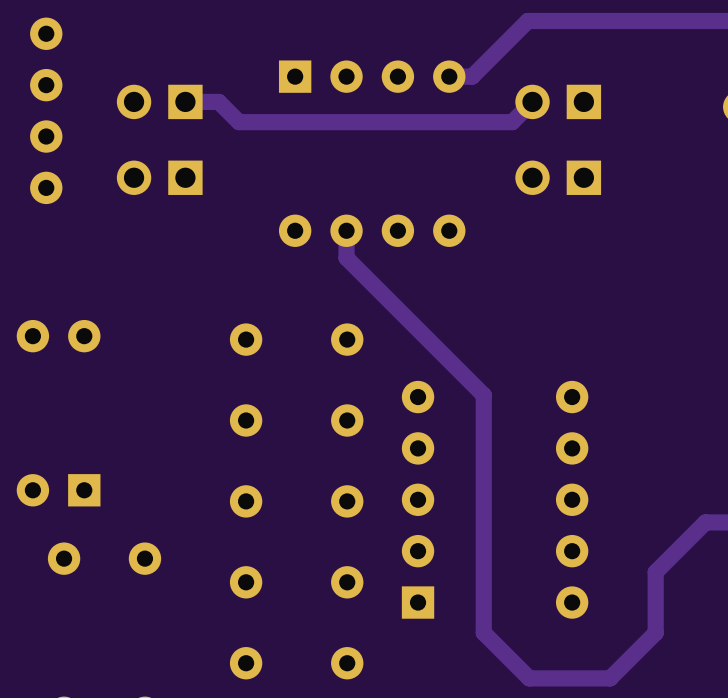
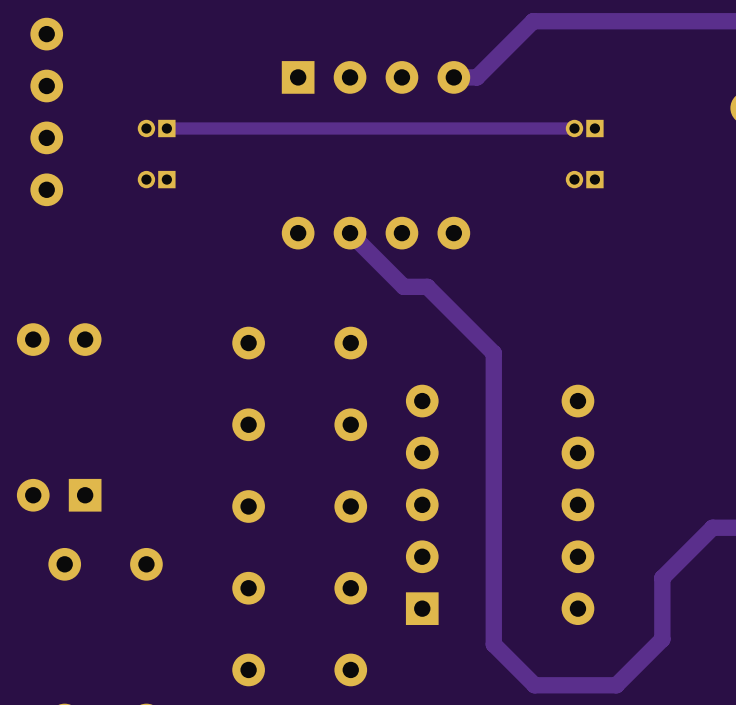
part: (159, 101) -> none
track: (532, 101) (512, 122) (239, 122) (218, 101) (185, 101) -> none
part: (558, 101) -> none
part: none -> (156, 128)
track: none -> (574, 128) (166, 128)
part: none -> (584, 128)
part footprint: [116, 160, 203, 195] -> [137, 170, 176, 189]
part: (558, 177) -> none
part: none -> (584, 179)
track: (346, 230) (346, 257) (483, 395) (483, 632) (488, 637) -> (350, 233) (403, 286) (427, 286) (493, 353) (493, 644)

